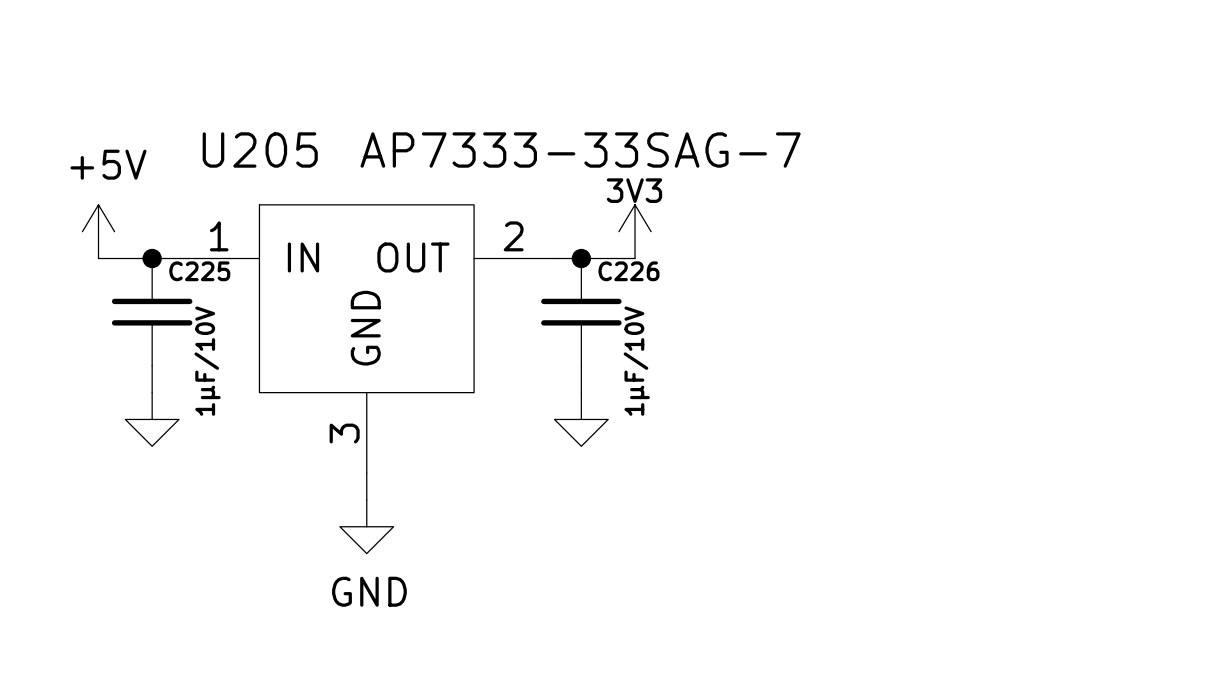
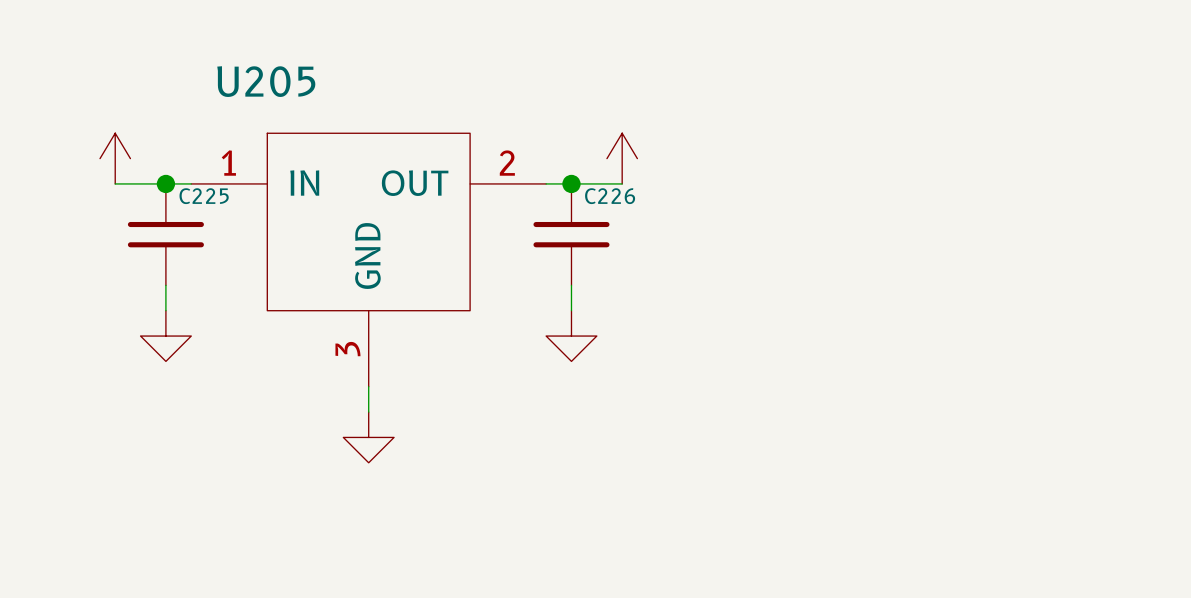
U205 value: AP7333-33SAG-7 (580, 150) -> none
power symbol text: +5V (108, 164) -> none
power symbol text: 3V3 (634, 190) -> none
C225 value: 1µF/10V (207, 361) -> none
C226 value: 1µF/10V (636, 361) -> none
power symbol text: GND (369, 591) -> none

